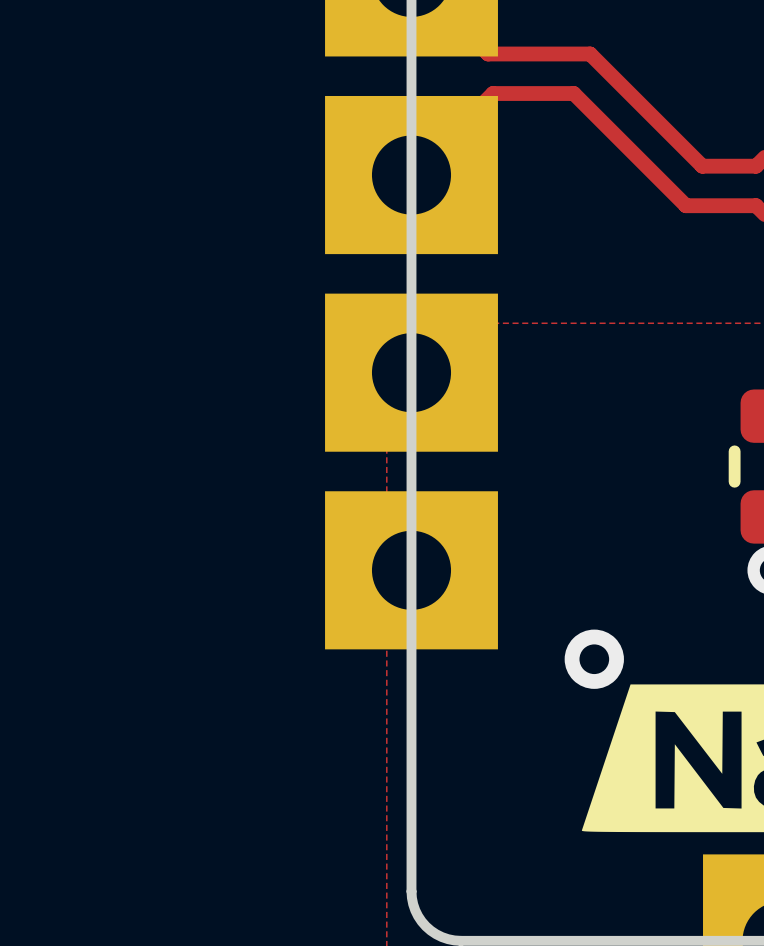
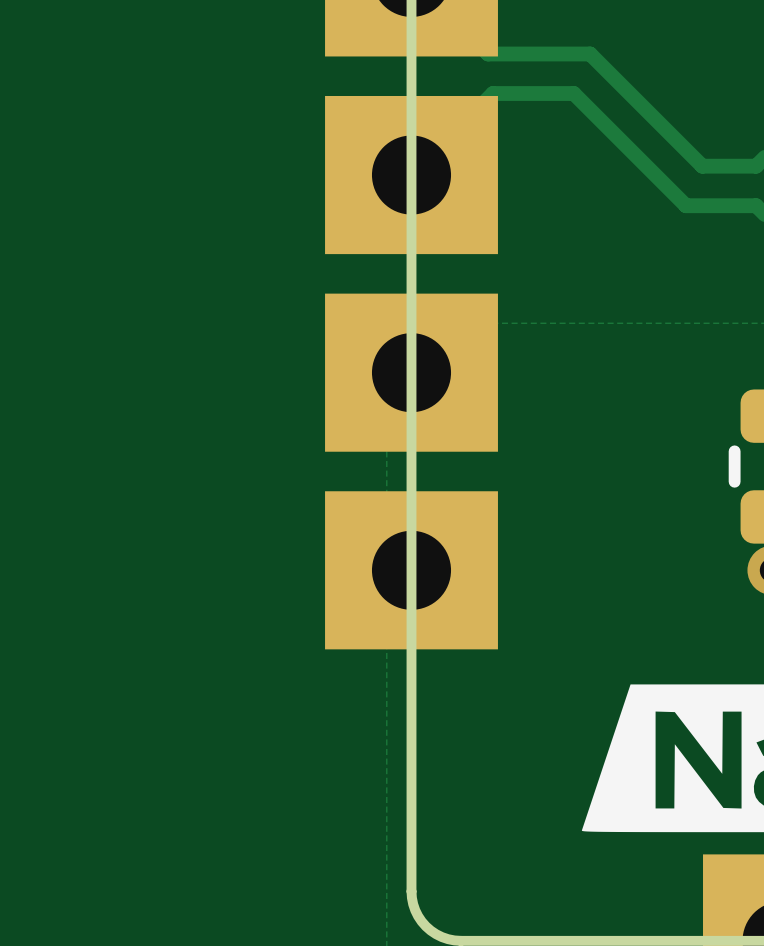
via: (594, 659) -> none

